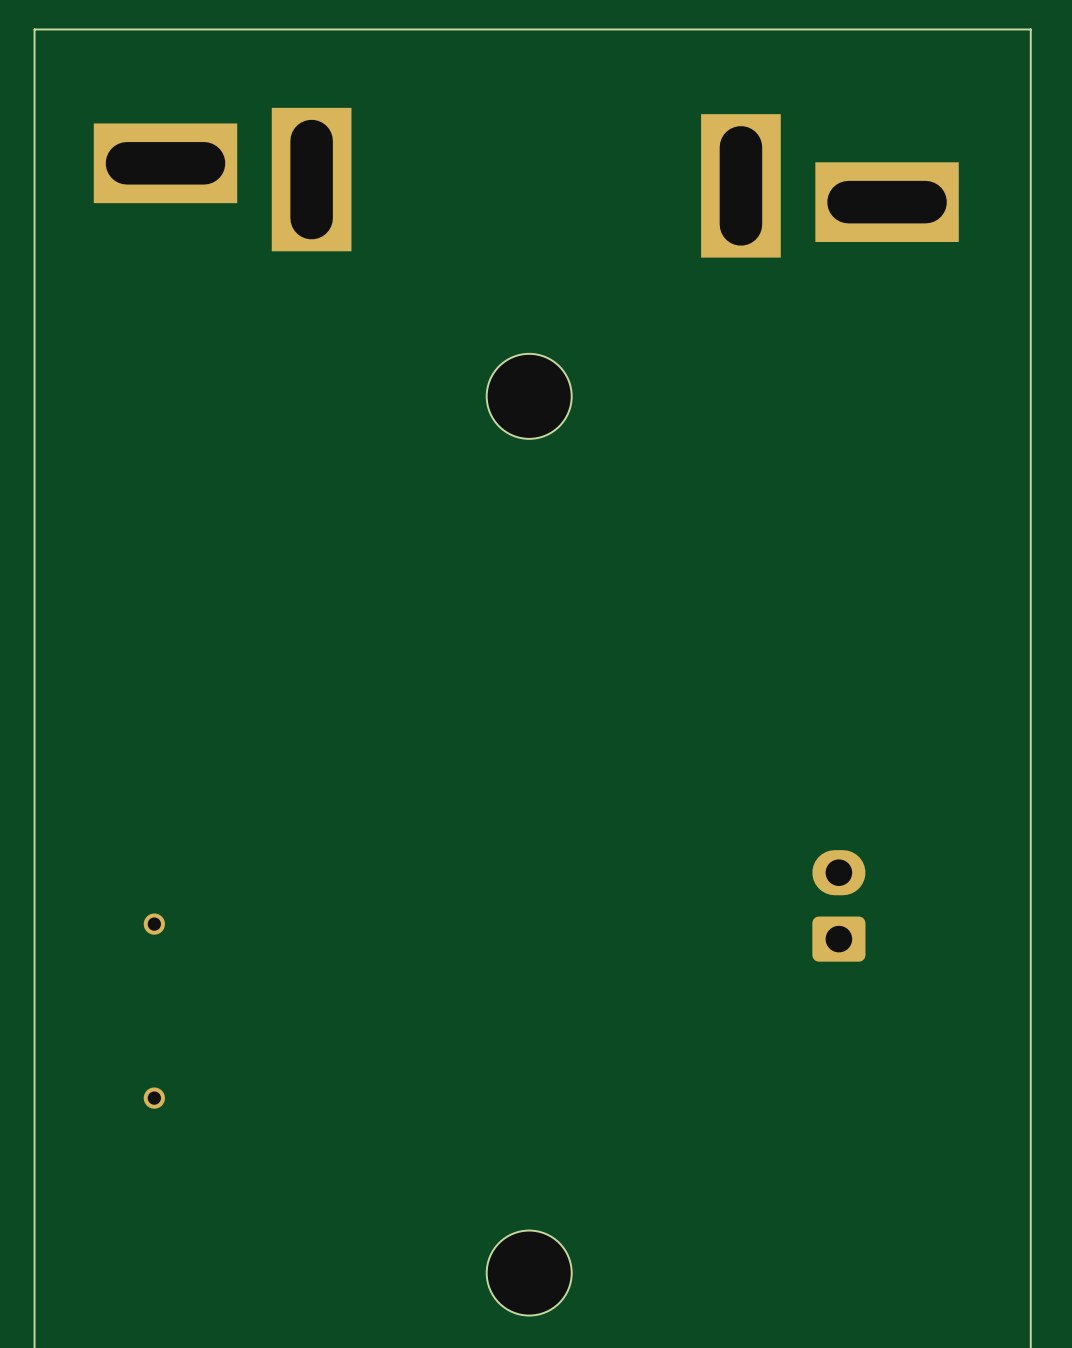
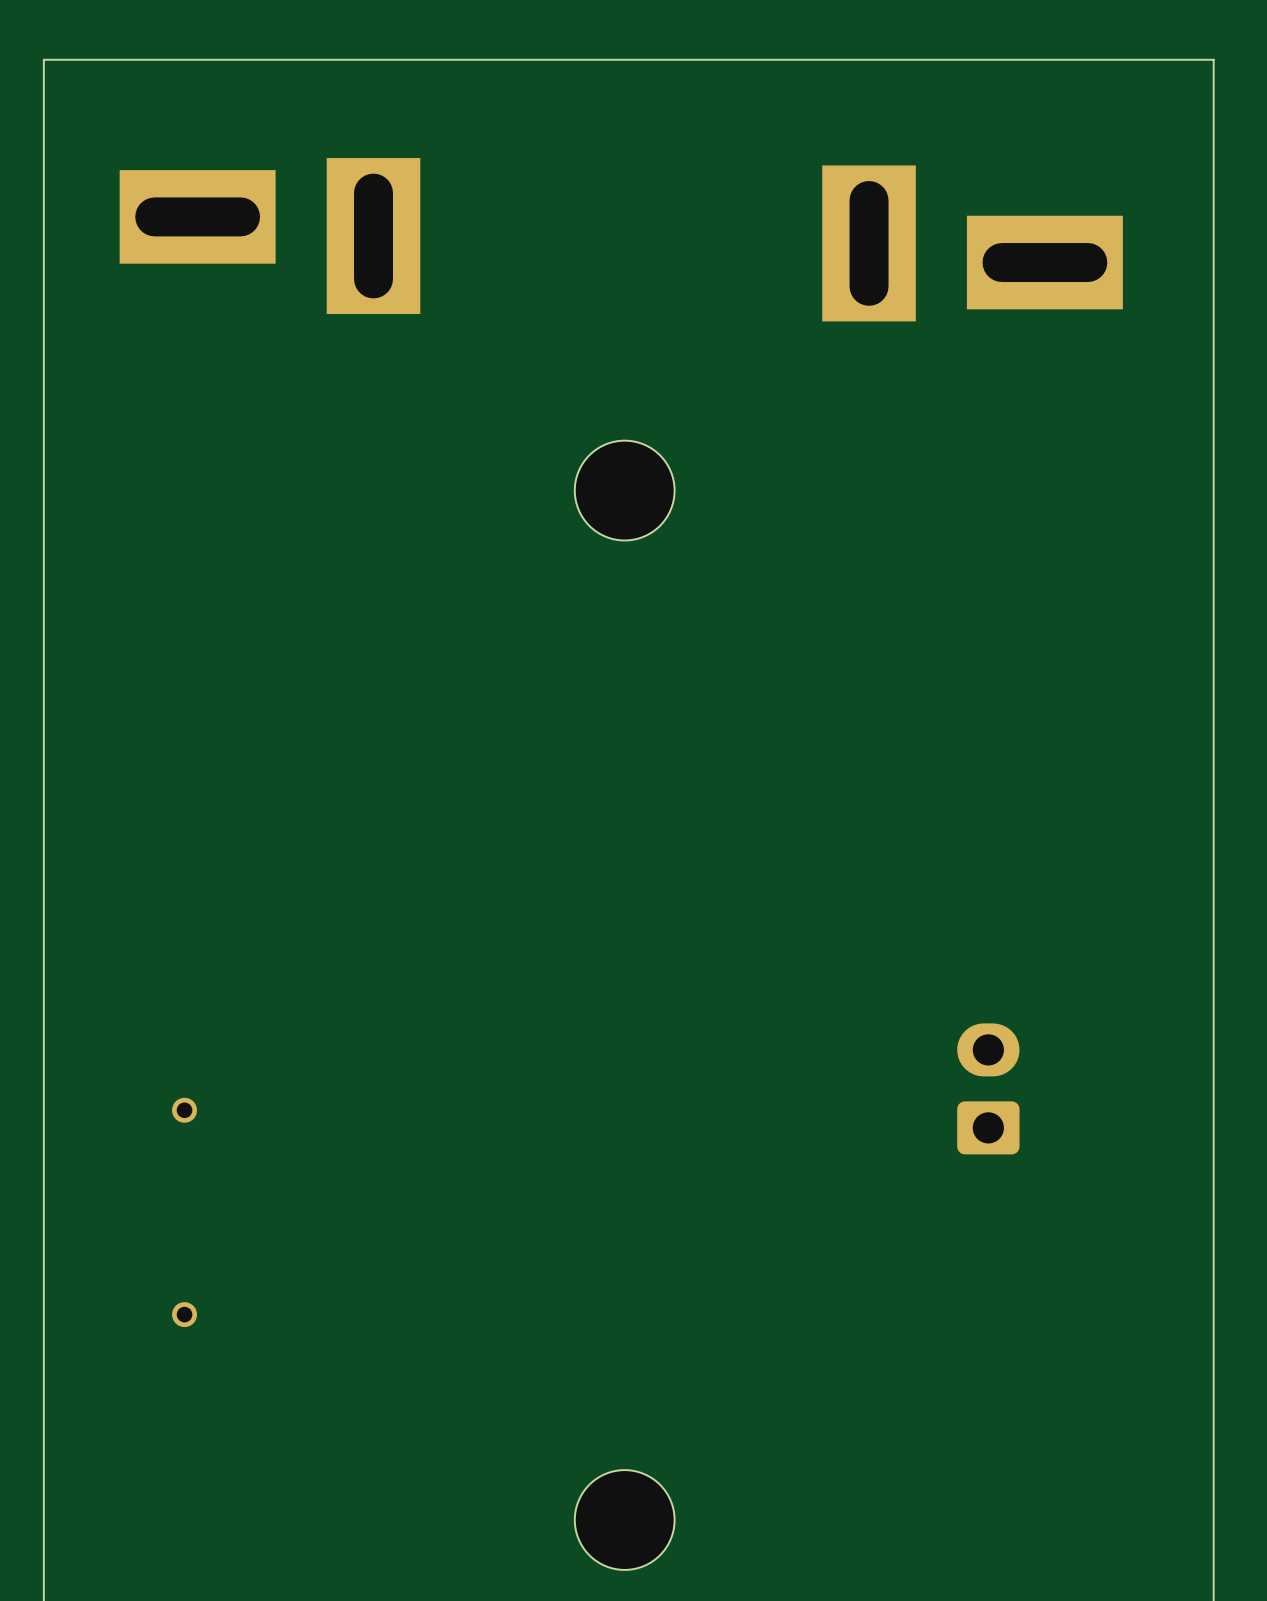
part footprint: [93, 107, 352, 252] -> [119, 158, 421, 315]
part footprint: [701, 114, 959, 258] -> [822, 165, 1123, 322]

